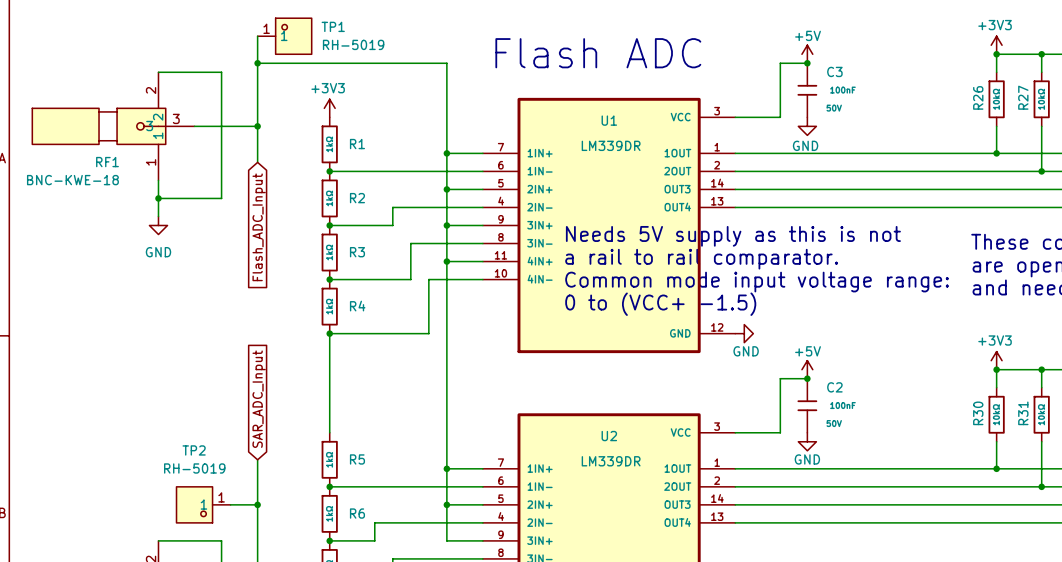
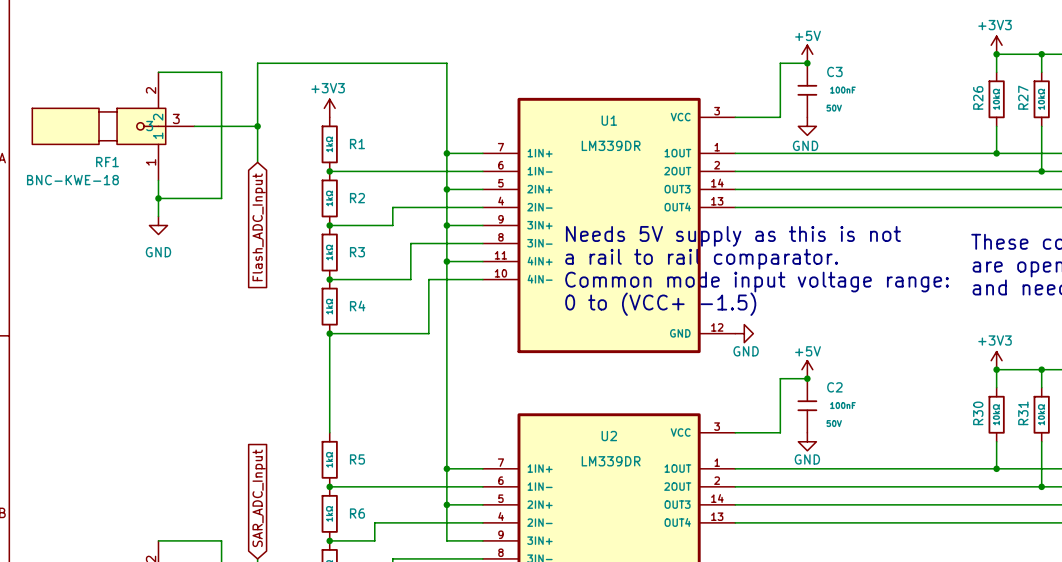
wire: (257, 36) (257, 63) -> none
TP1: RH-5019 (284, 36) -> none
text: Flash ADC (598, 53) -> none
junction: (257, 63) -> none
global label position: SAR_ADC_Input (259, 399) -> SAR_ADC_Input (259, 498)
wire: (257, 459) (257, 558) -> none
TP2: RH-5019 (203, 504) -> none
wire: (230, 504) (257, 504) -> none
junction: (257, 504) -> none

